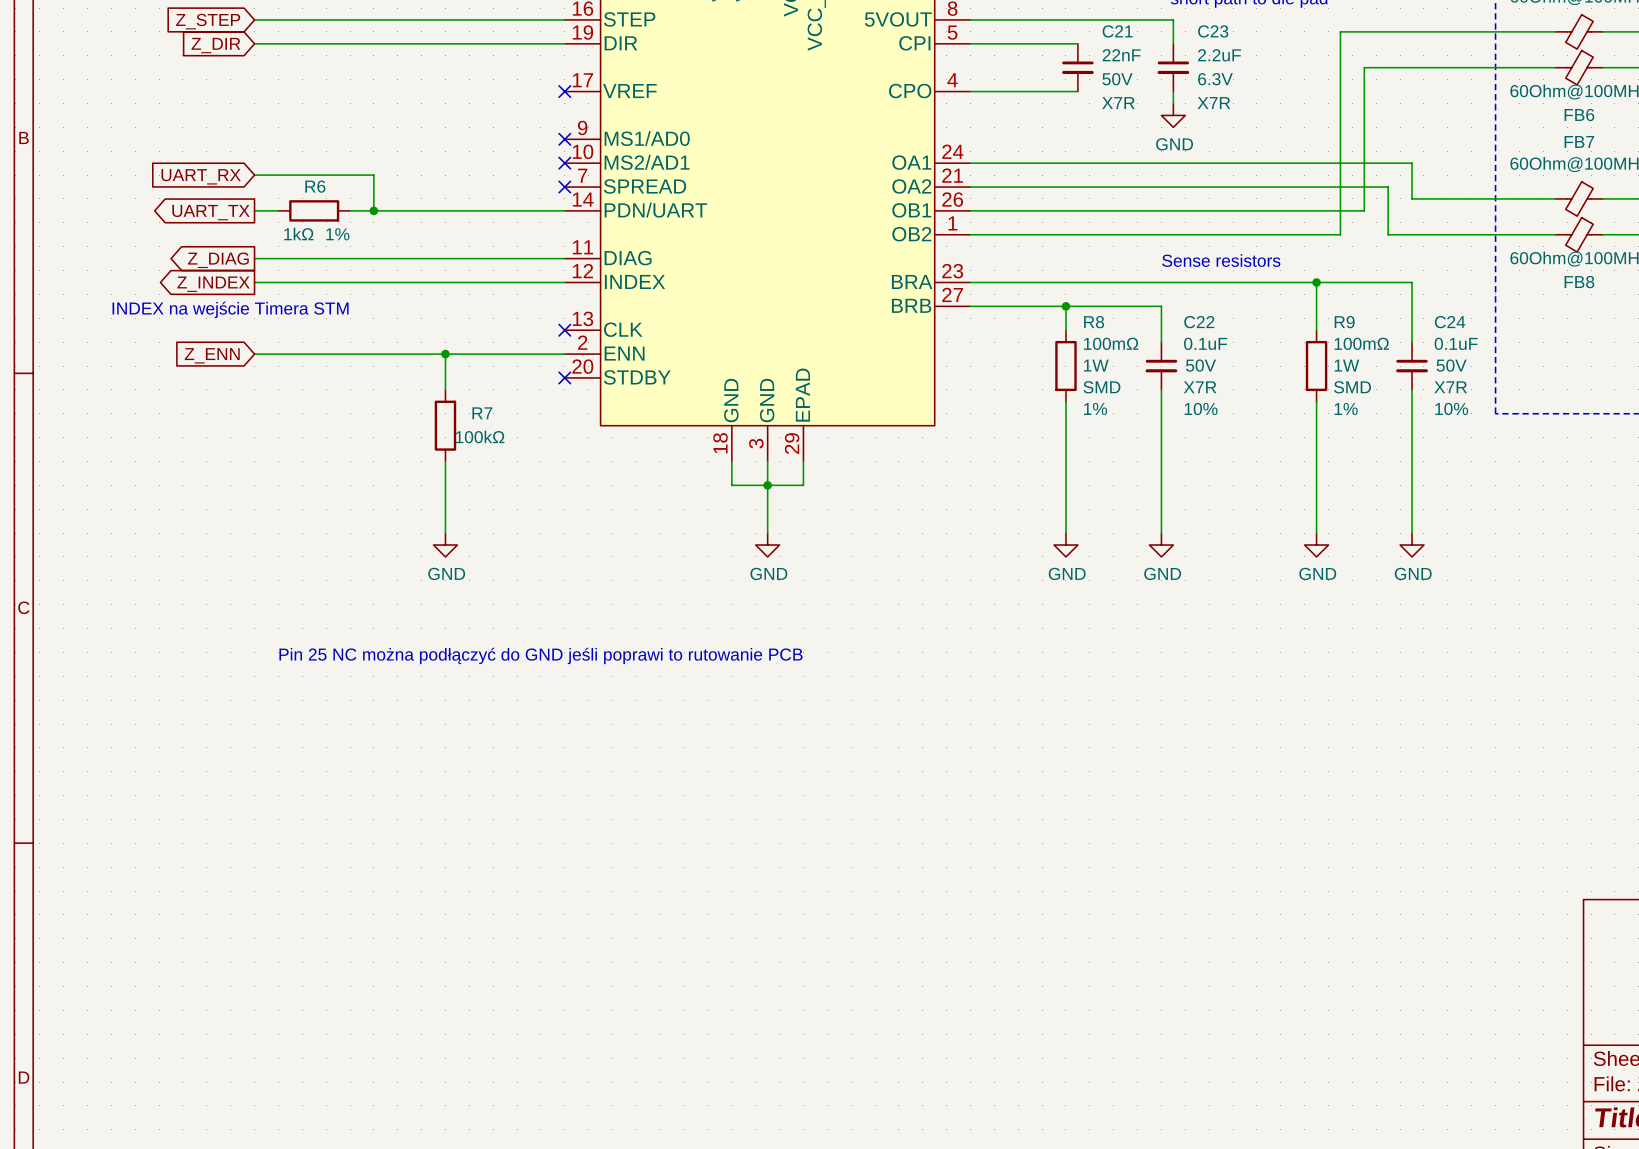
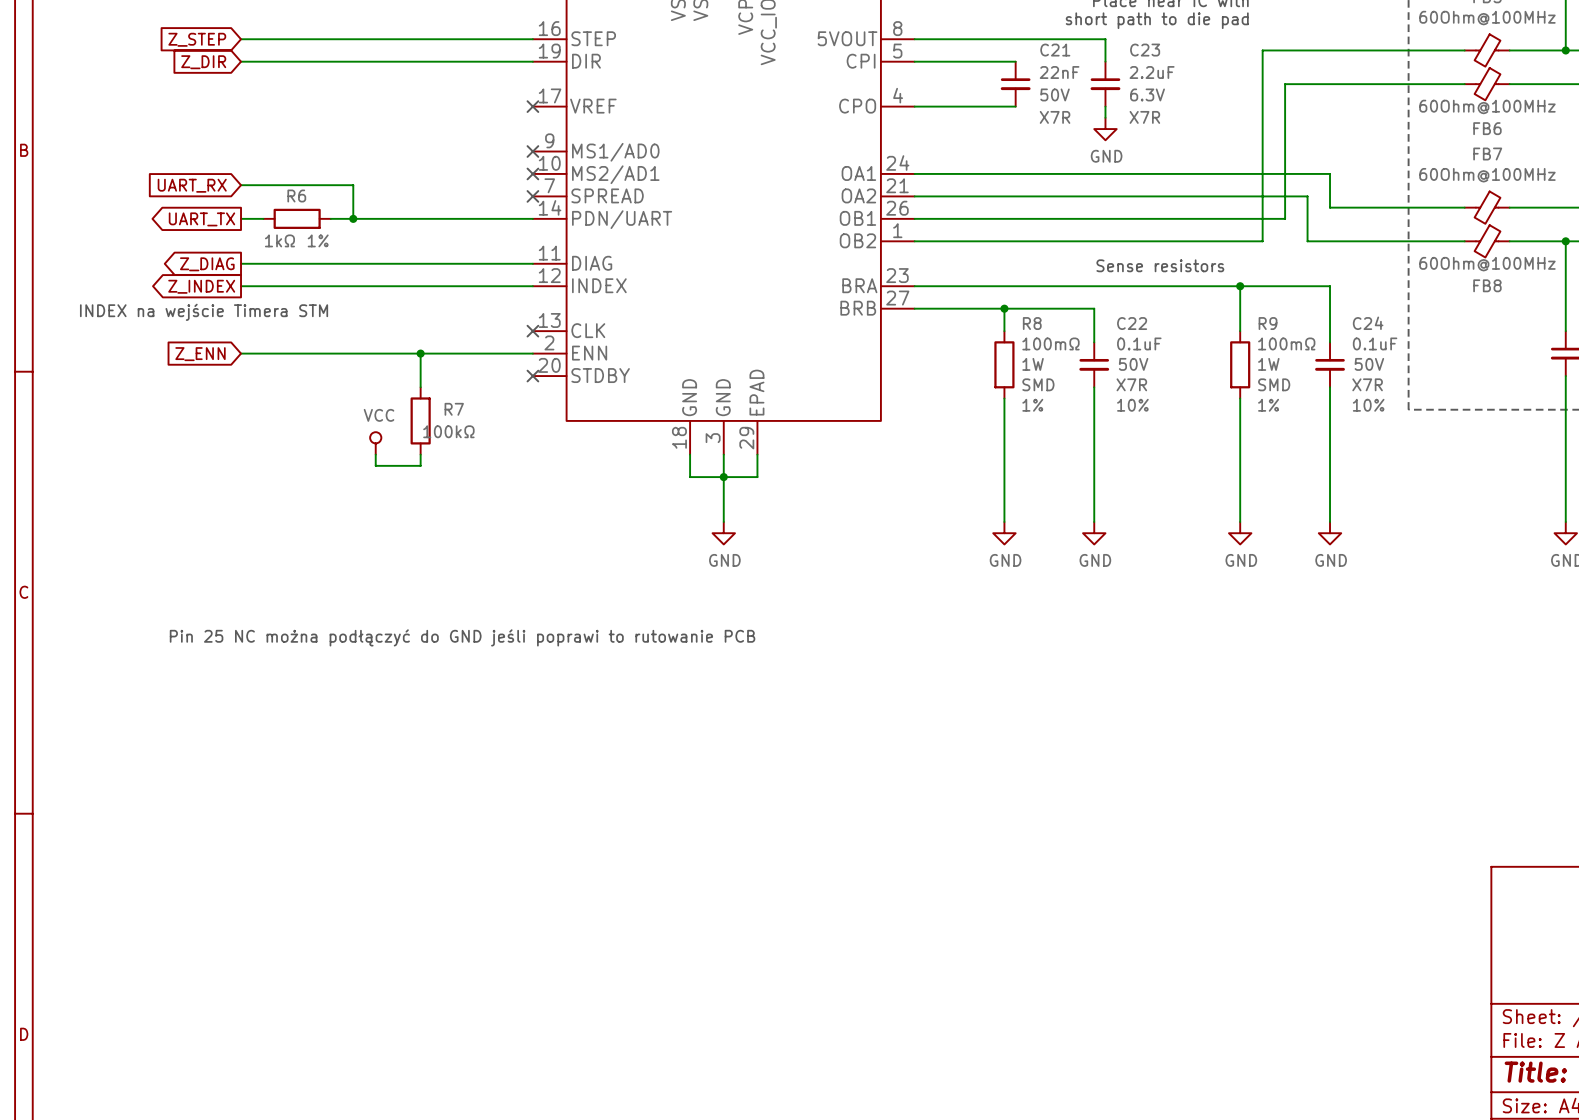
power symbol: none -> VCC (375, 443)
wire: (445, 473) (445, 533) -> (420, 465) (375, 465) (375, 454)
power symbol: GND (445, 545) -> none

